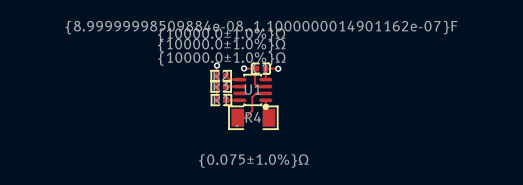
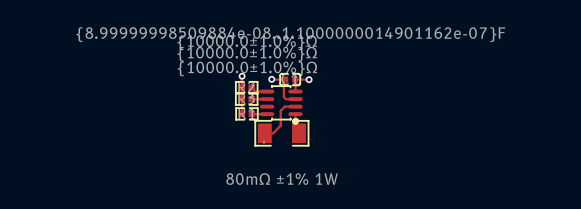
U1 name: U1 (252, 89) -> none
R4 name: R4 (253, 117) -> none
R4 value: {0.075±1.0%}Ω (253, 160) -> 80mΩ ±1% 1W (282, 179)

